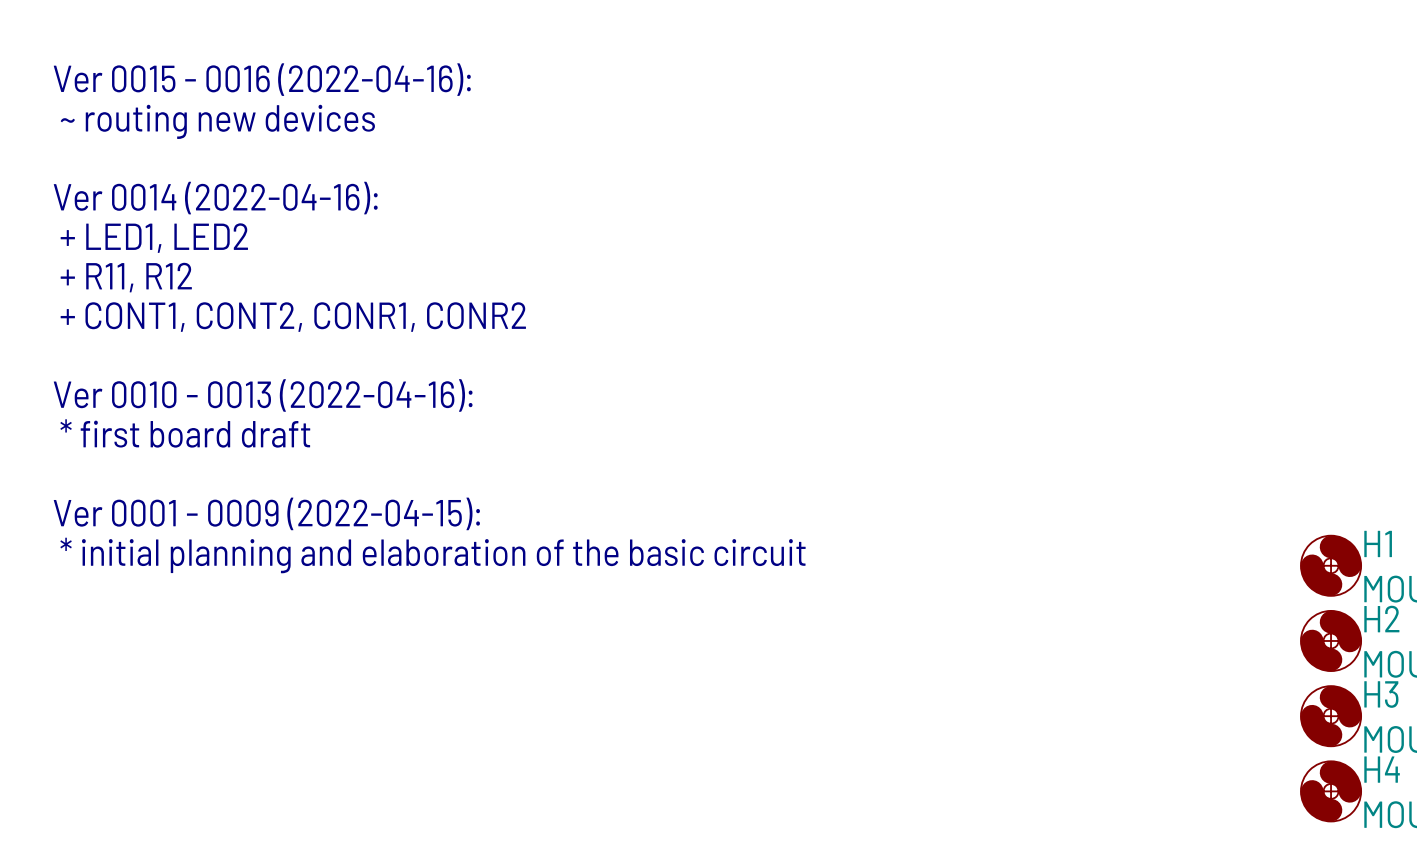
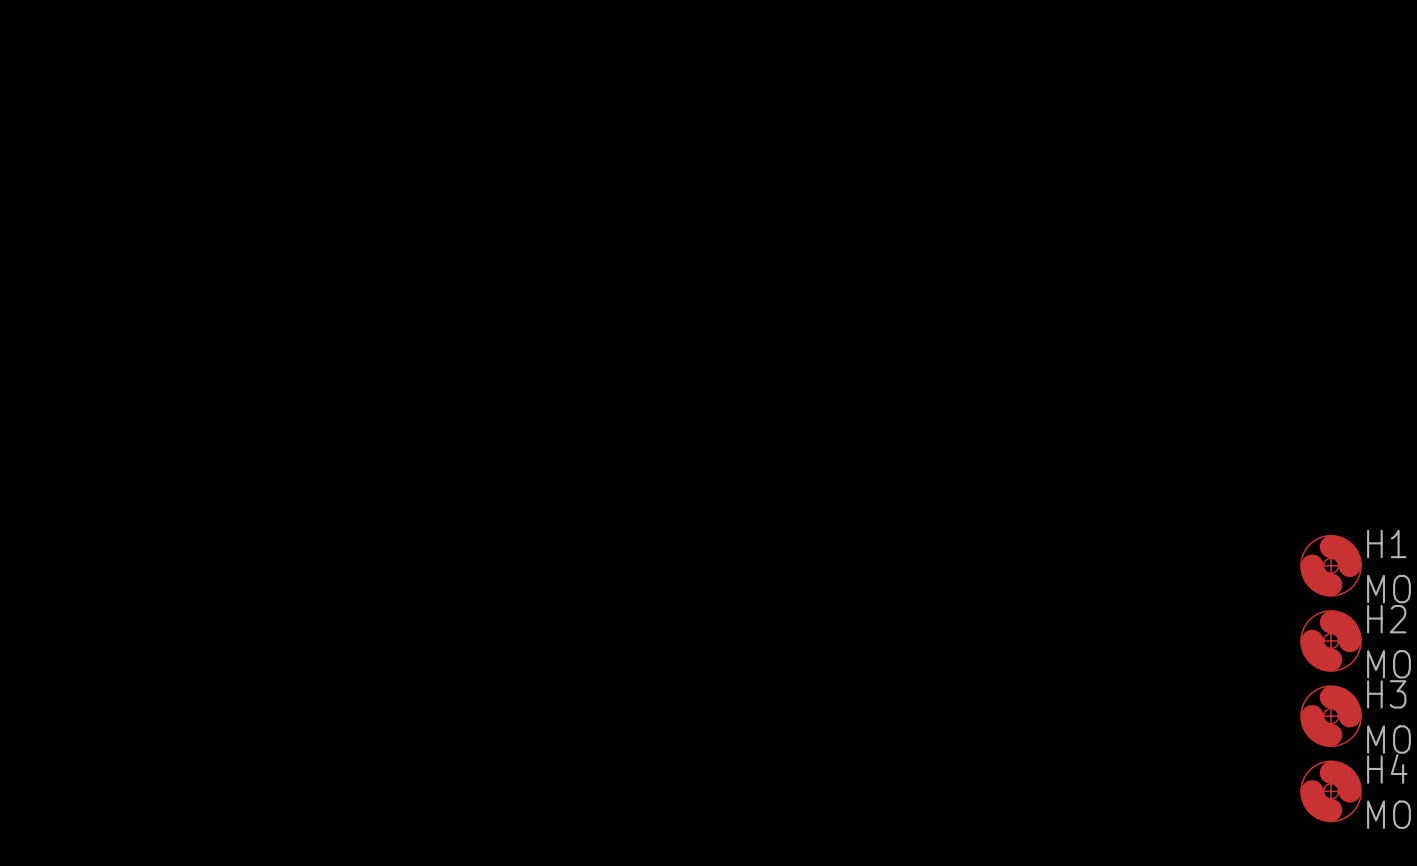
text: Ver 0015 - 0016 (2022-04-16): (262, 79) -> none
text: ~ routing new devices (217, 121) -> none
text: Ver 0014 (2022-04-16): (215, 198) -> none
text: + LED1, LED2 (154, 238) -> none
text: + R11, R12 (126, 277) -> none
text: + CONT1, CONT2, CONR1, CONR2 (293, 317) -> none
text: Ver 0010 - 0013 (2022-04-16): (263, 395) -> none
text: * first board draft (185, 433) -> none
text: Ver 0001 - 0009 (2022-04-15): (266, 513) -> none
text: * initial planning and elaboration of the basic circuit (433, 555) -> none

